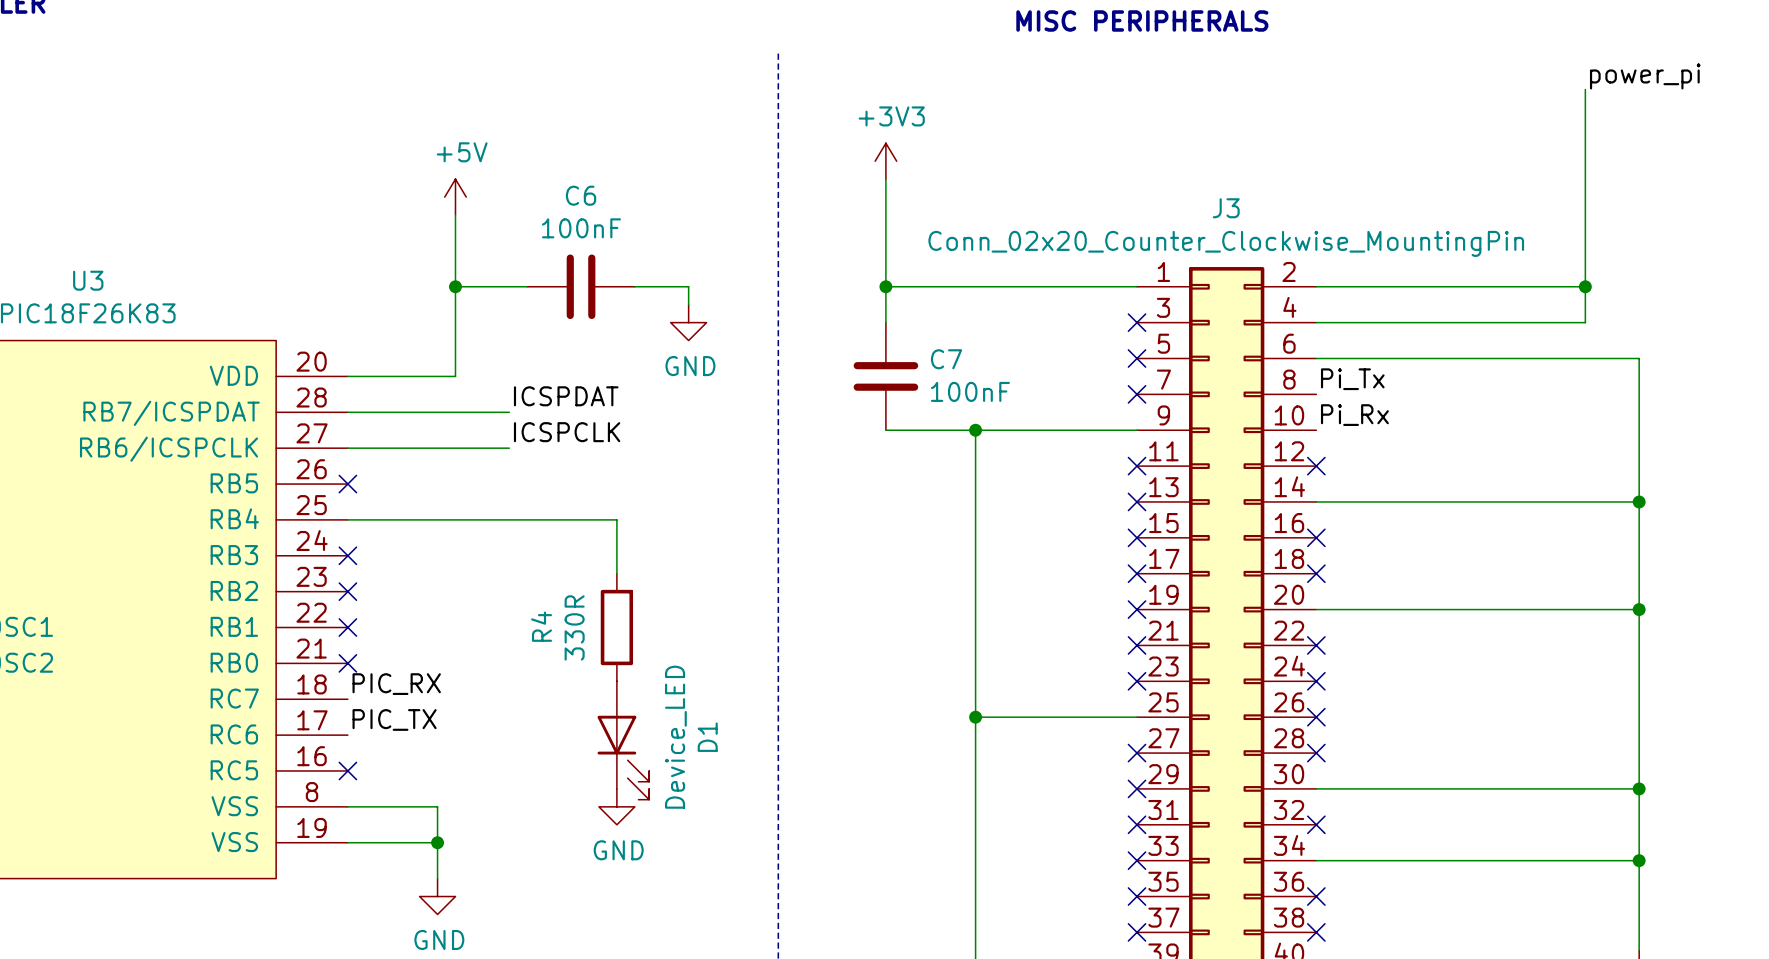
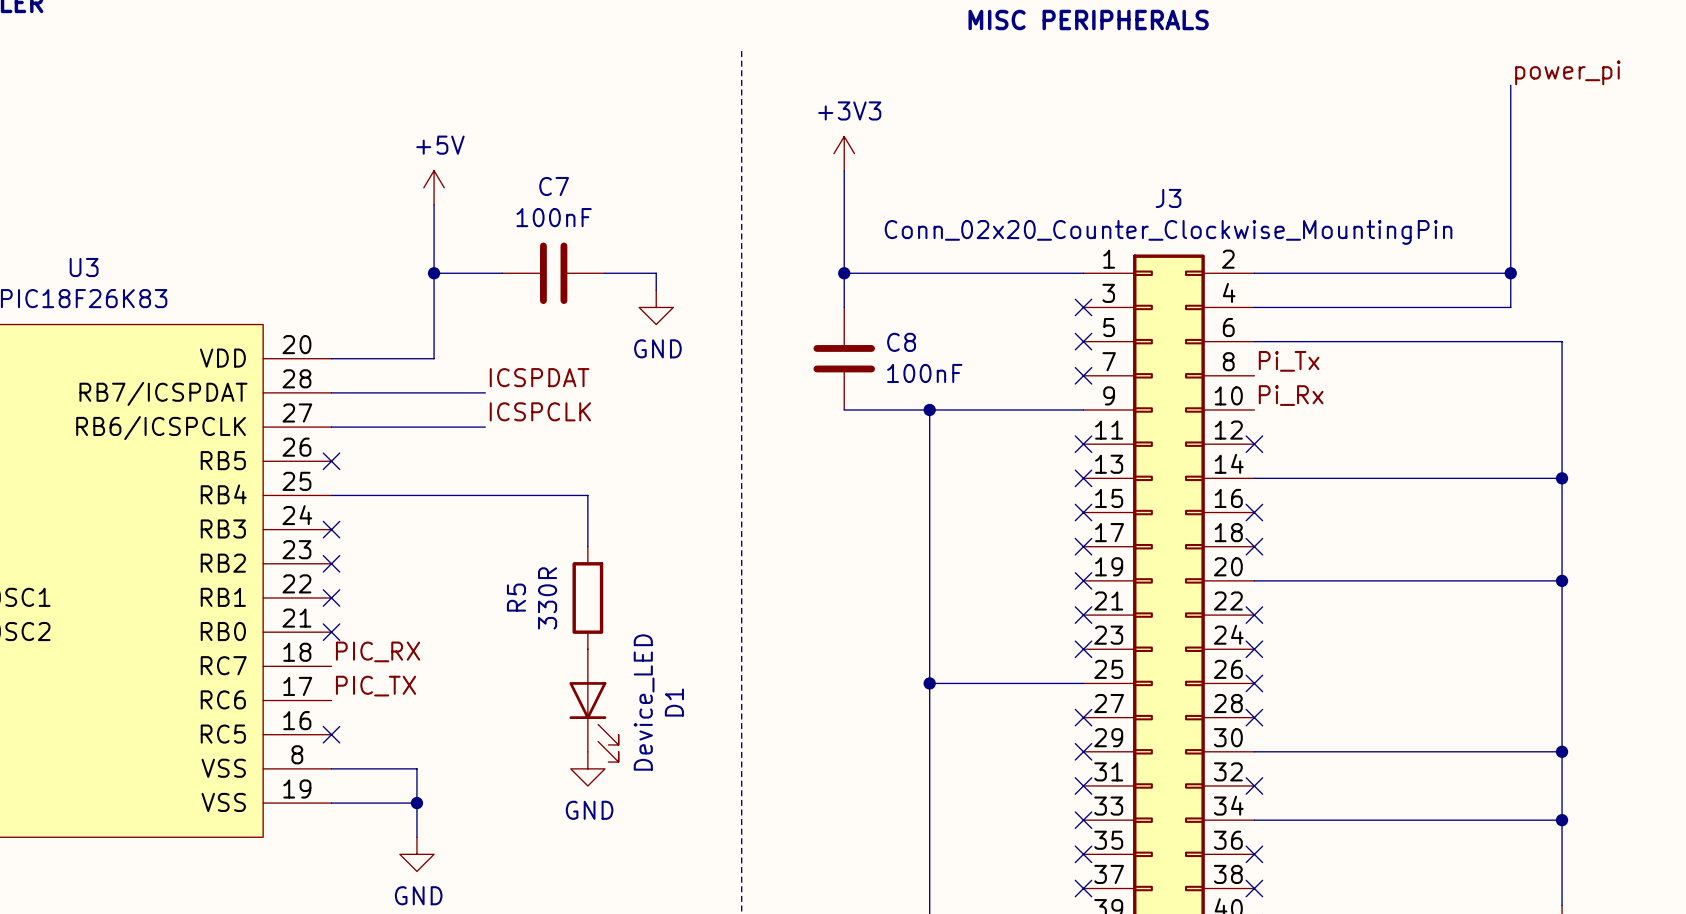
C6 name: C6 (581, 195) -> C7 (554, 186)
C7 name: C7 (946, 359) -> C8 (901, 342)
R4 name: R4 (541, 626) -> R5 (516, 597)

